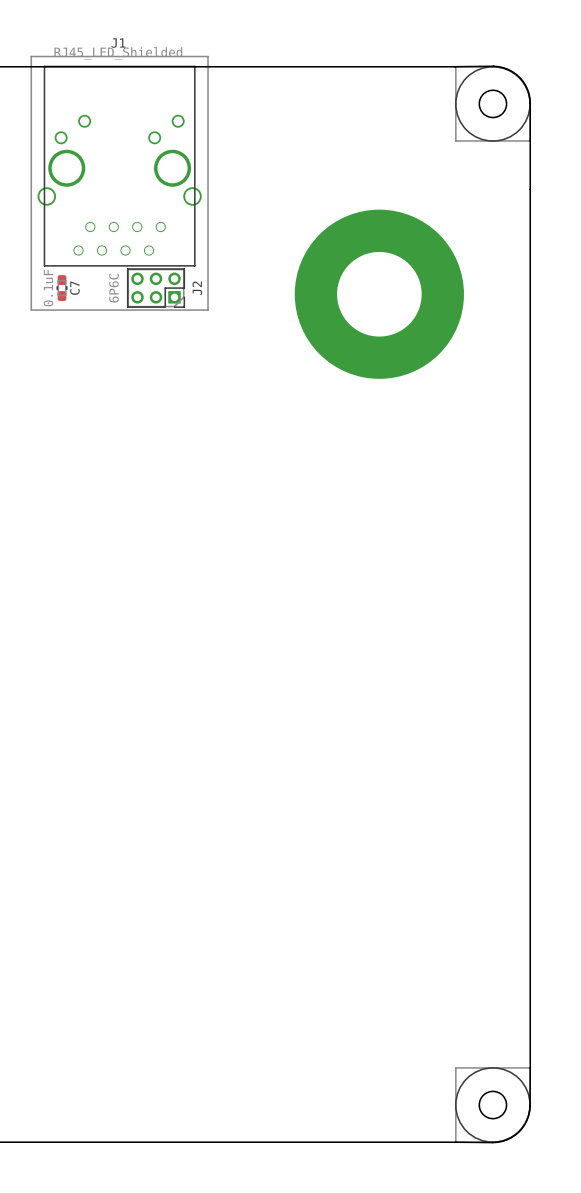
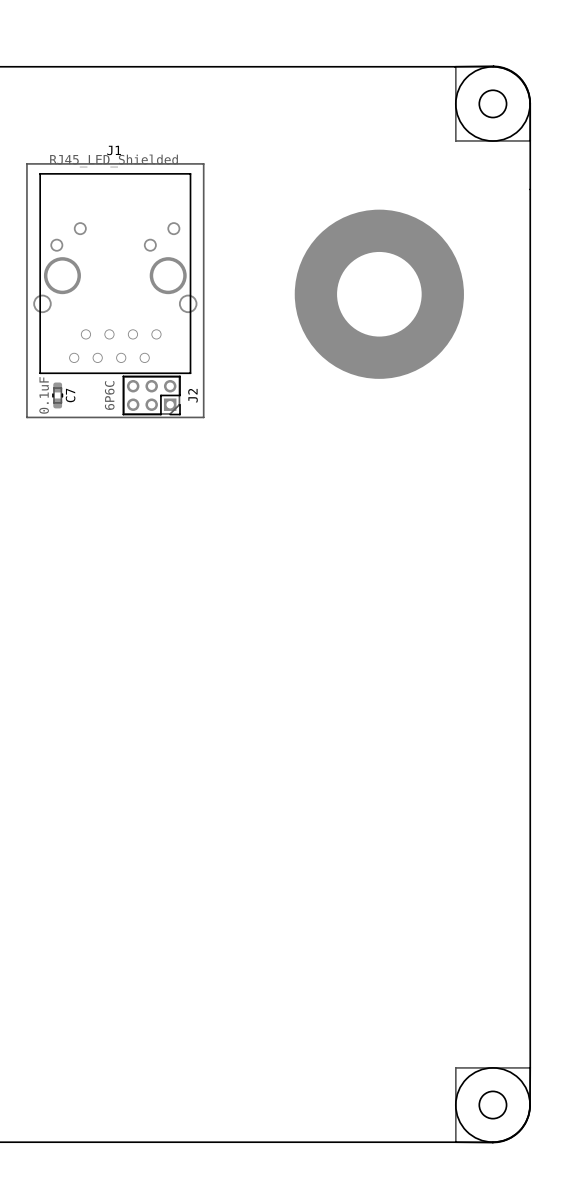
J1 position: (119, 183) -> (115, 290)
C7 position: (62, 288) -> (57, 395)
J2 position: (156, 288) -> (151, 395)

